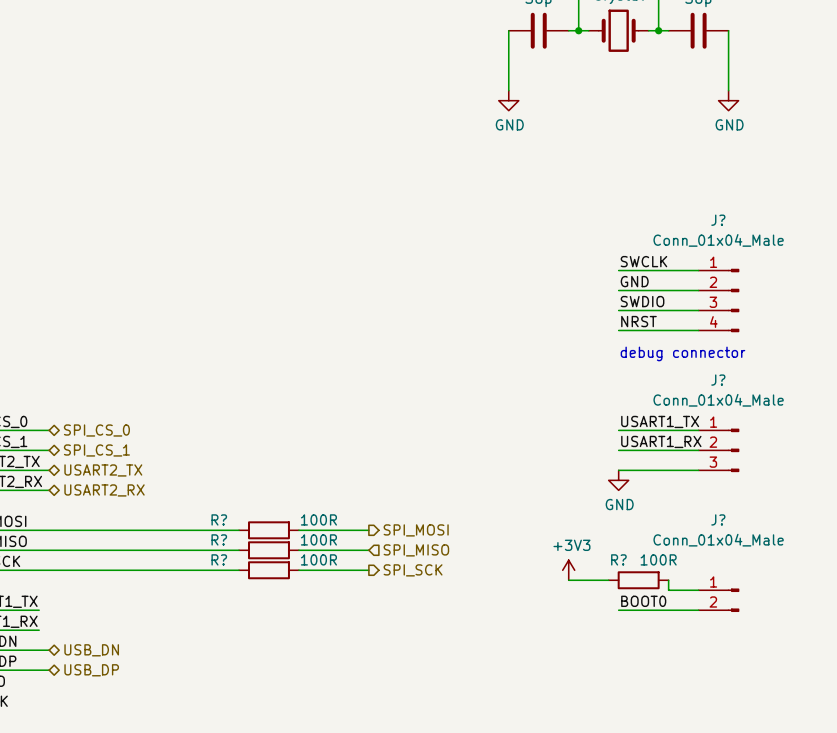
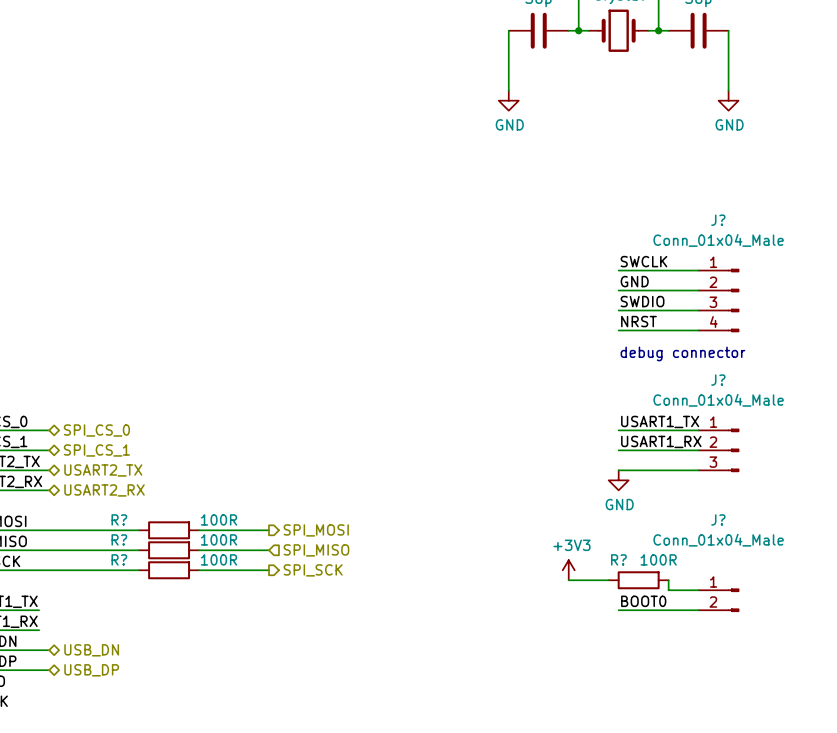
wire: (139, 530) (199, 530) -> none
R?: none -> 100R (169, 530)
wire: none -> (239, 530) (268, 530)
R?: 100R (268, 530) -> none
wire: (298, 530) (368, 530) -> none
hierarchical label position: SPI_MOSI (416, 530) -> SPI_MOSI (316, 530)
wire: (139, 550) (199, 550) -> none
R?: none -> 100R (169, 550)
wire: none -> (239, 550) (268, 550)
R?: 100R (268, 550) -> none
wire: (298, 550) (368, 550) -> none
hierarchical label position: SPI_MISO (416, 550) -> SPI_MISO (316, 550)
wire: (139, 570) (199, 570) -> none
R?: none -> 100R (169, 570)
wire: none -> (239, 570) (268, 570)
R?: 100R (268, 570) -> none
wire: (298, 570) (368, 570) -> none
hierarchical label position: SPI_SCK (413, 570) -> SPI_SCK (313, 570)

